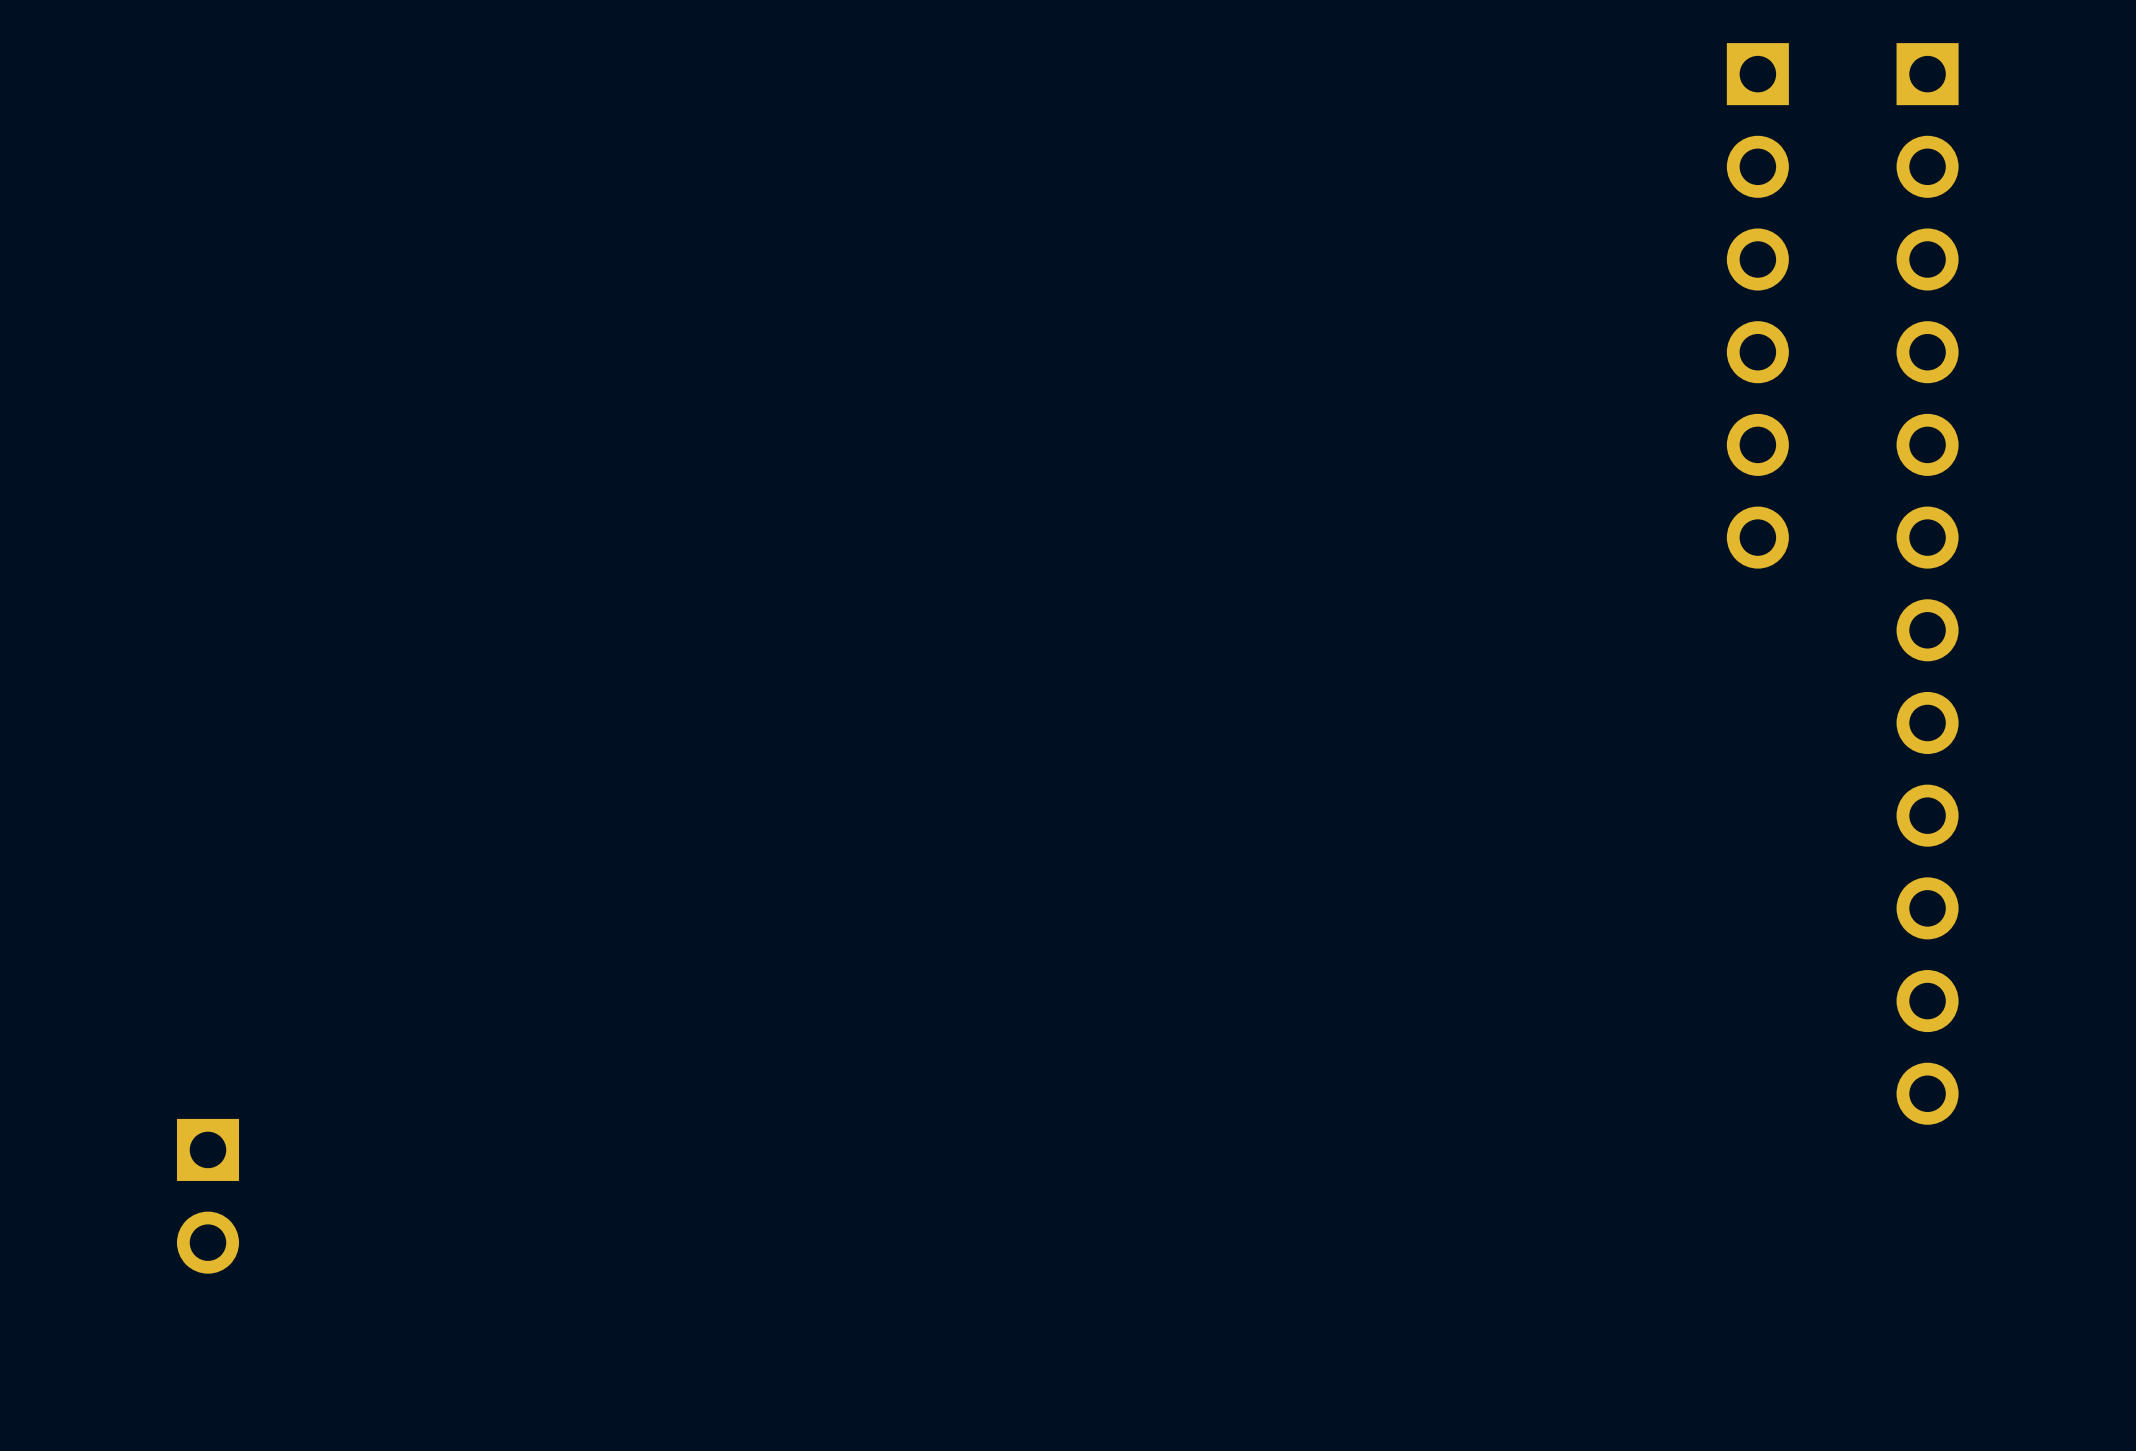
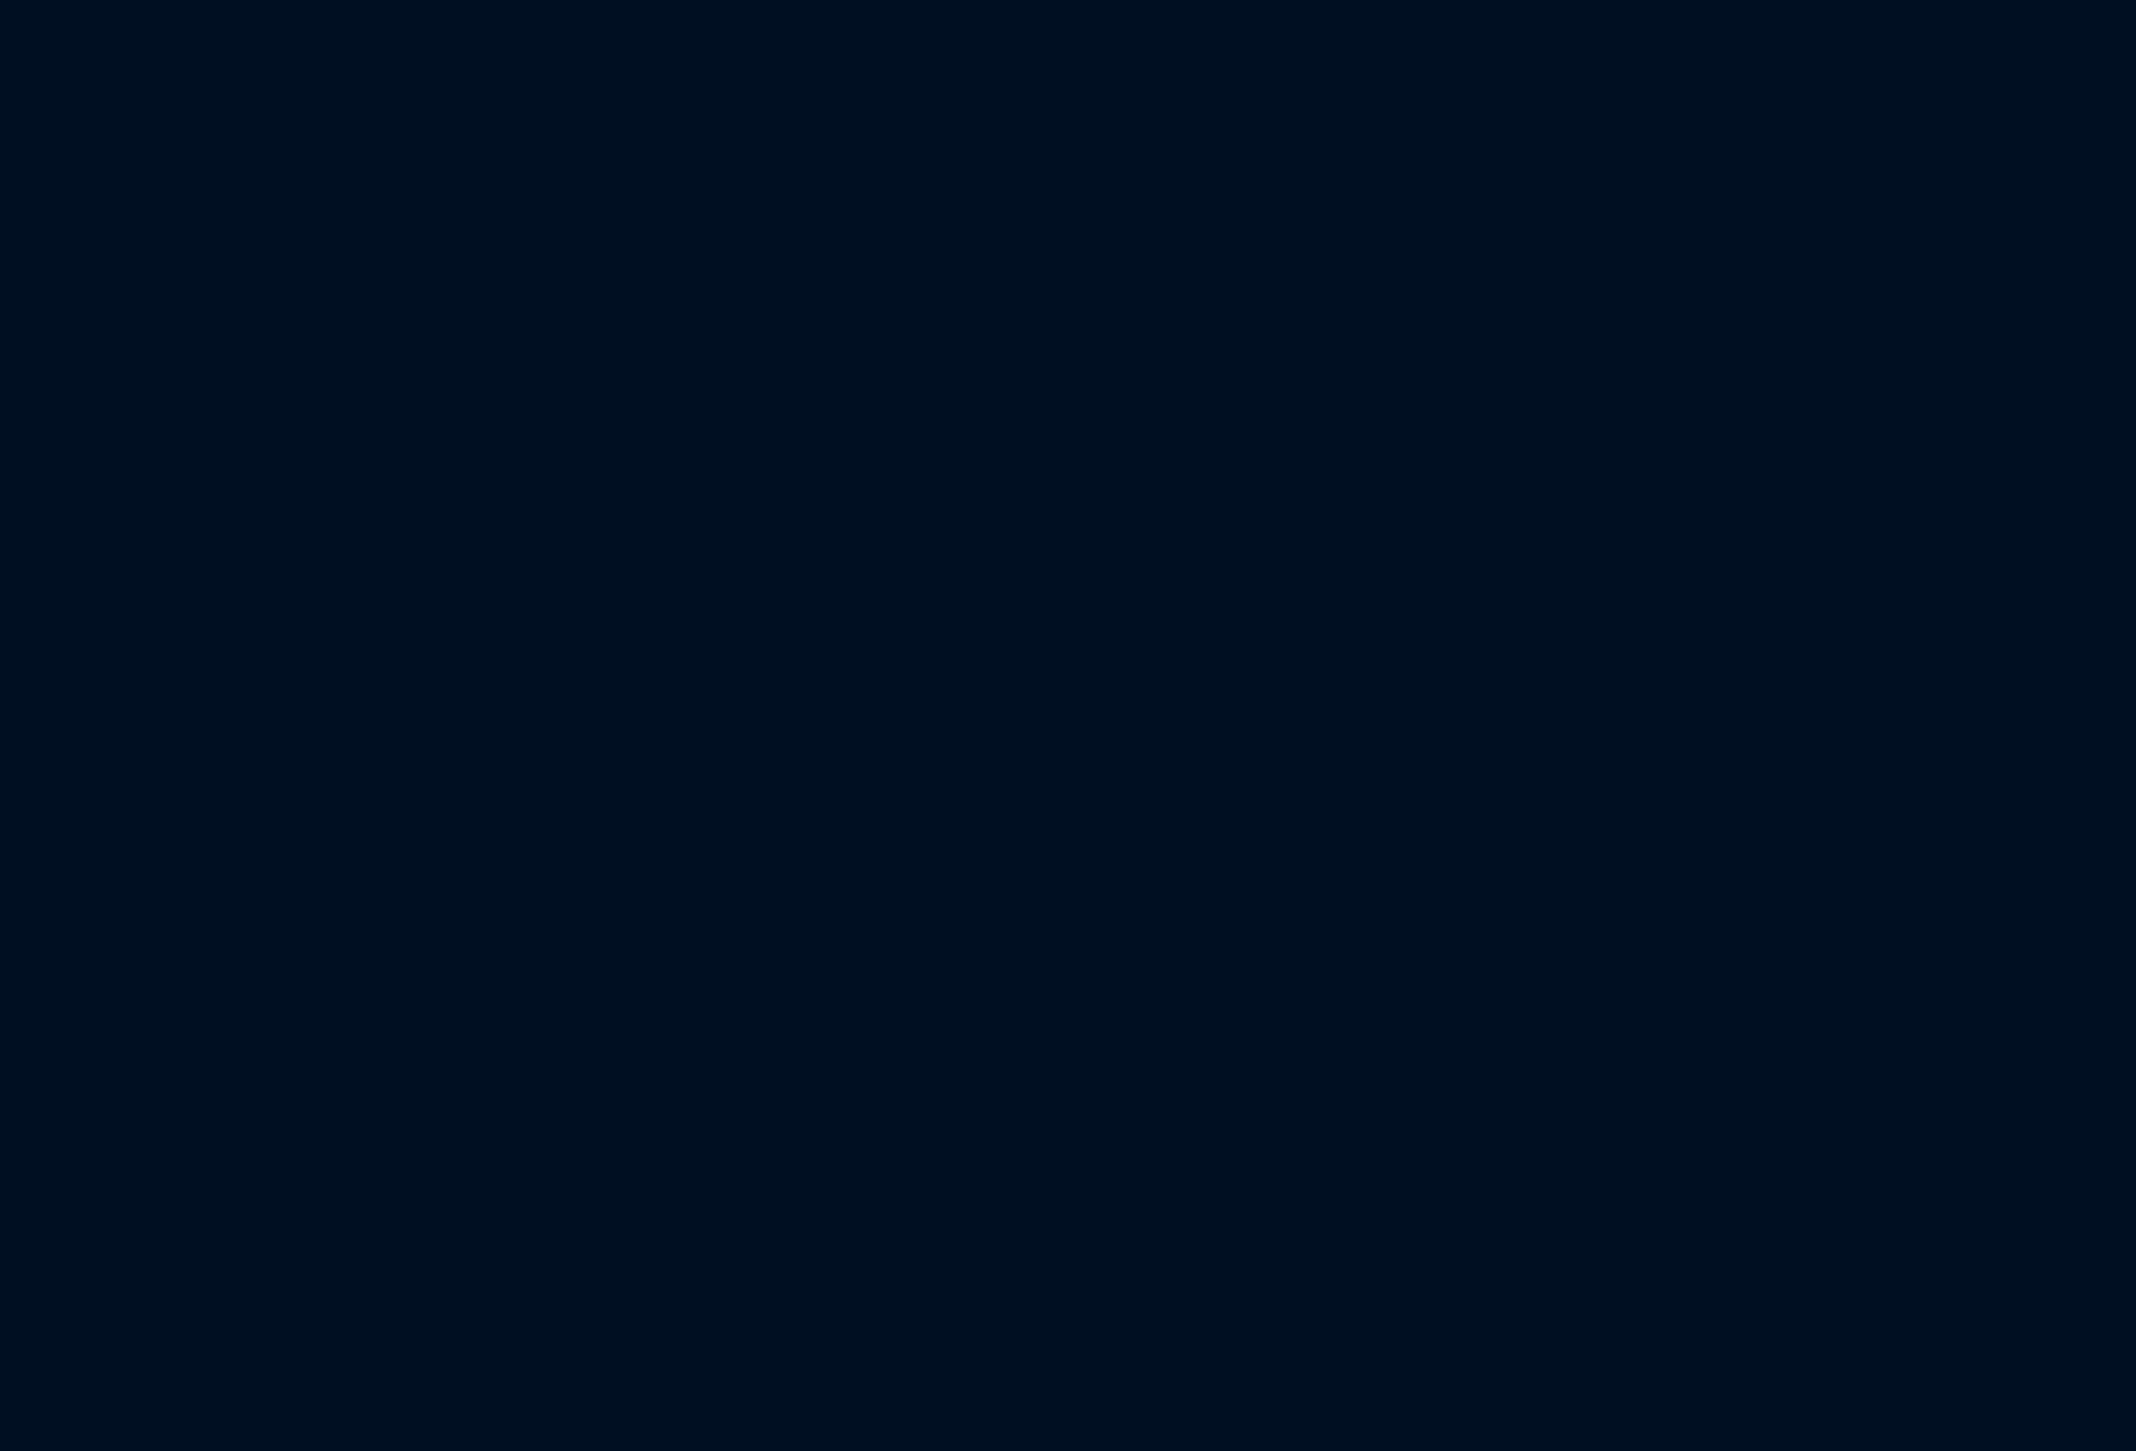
part: (1757, 305) -> none
part: (1927, 583) -> none
part: (207, 1196) -> none

